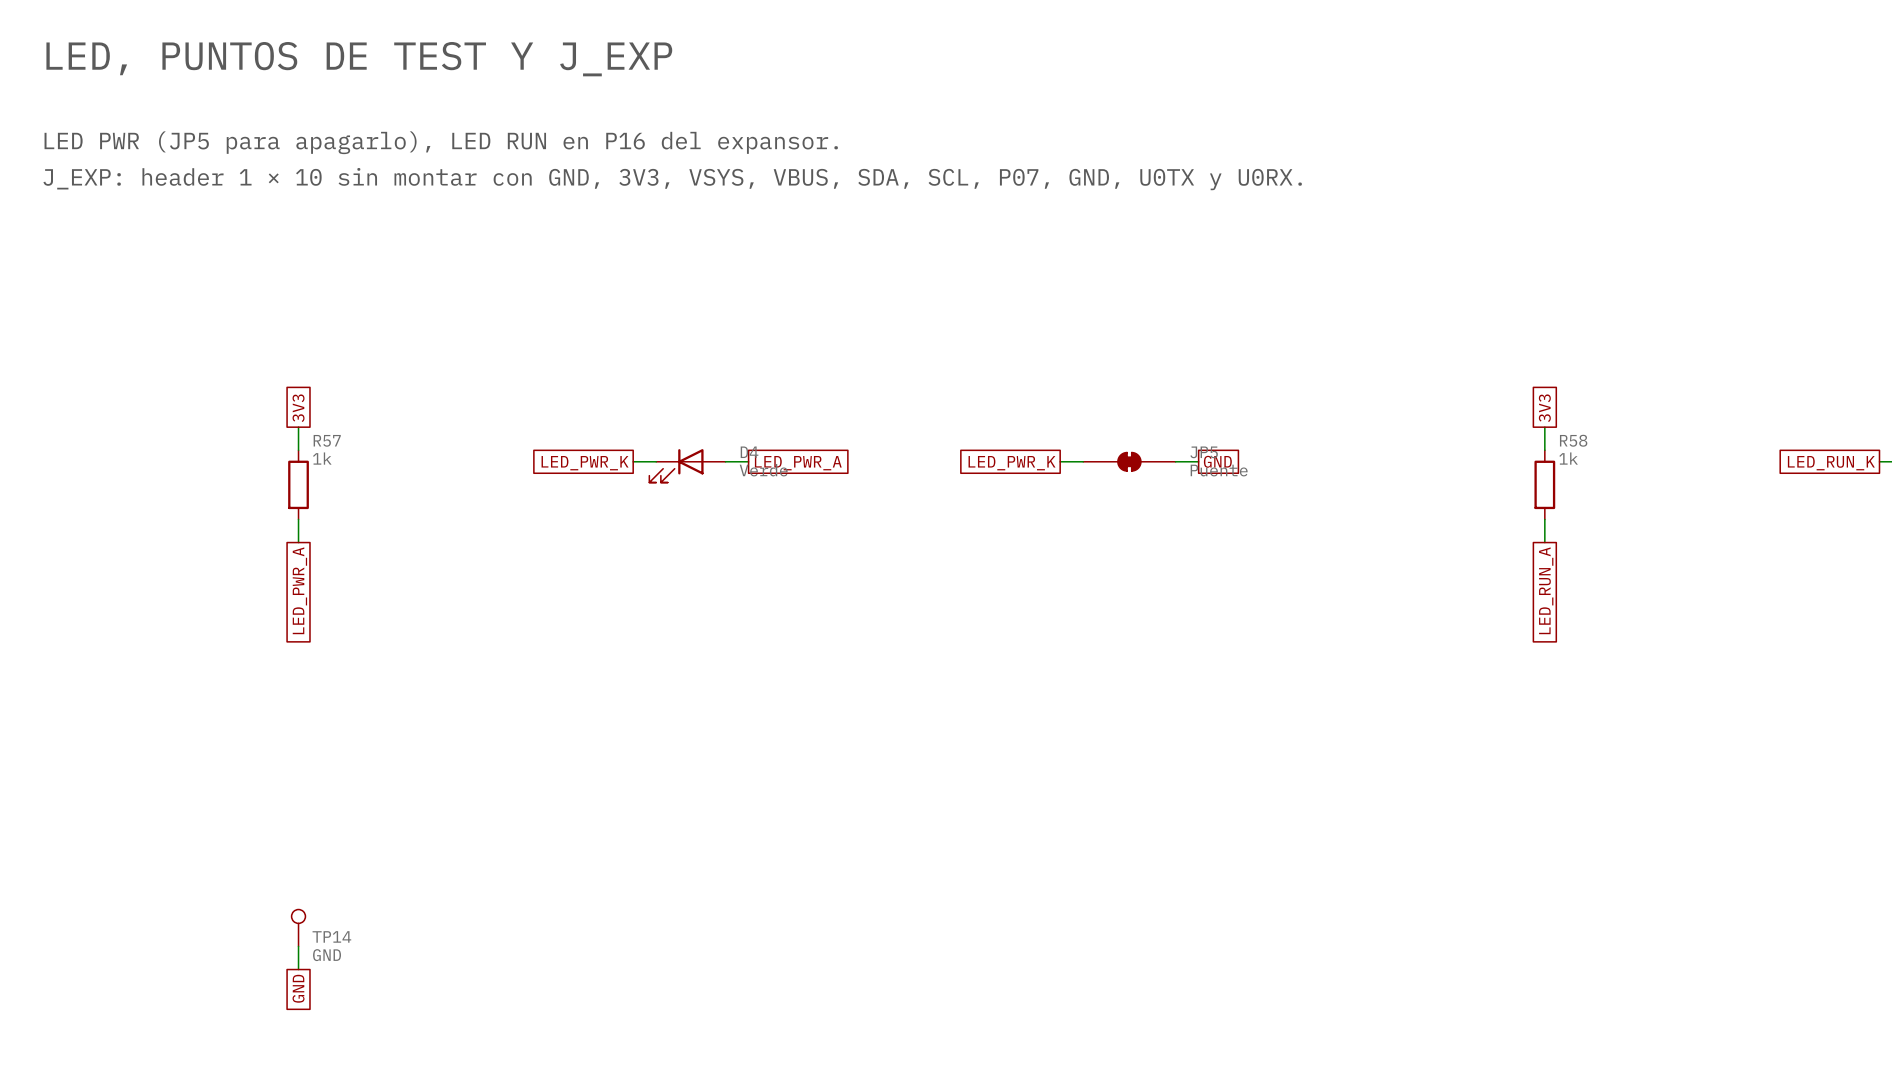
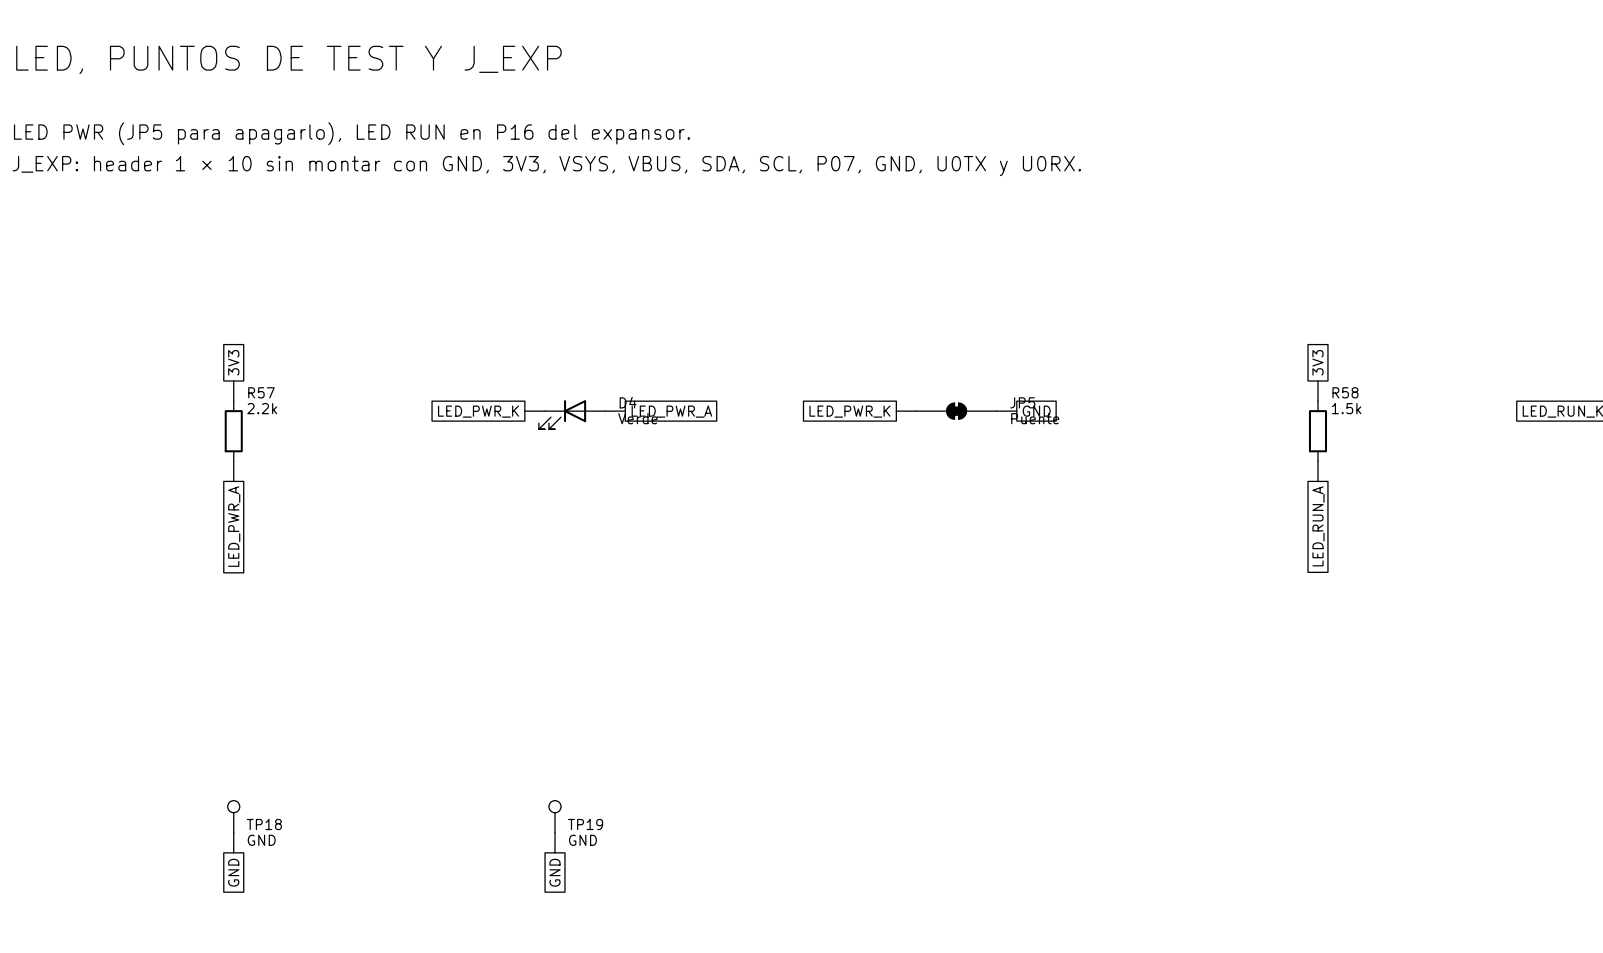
R57 value: 1k (322, 458) -> 2.2k (262, 408)
R58 value: 1k (1568, 458) -> 1.5k (1346, 408)
TP19: none -> GND (555, 816)
TP14 name: TP14 (331, 936) -> TP18 (264, 824)
wire: none -> (555, 832) (555, 852)
global label: none -> GND (555, 872)

